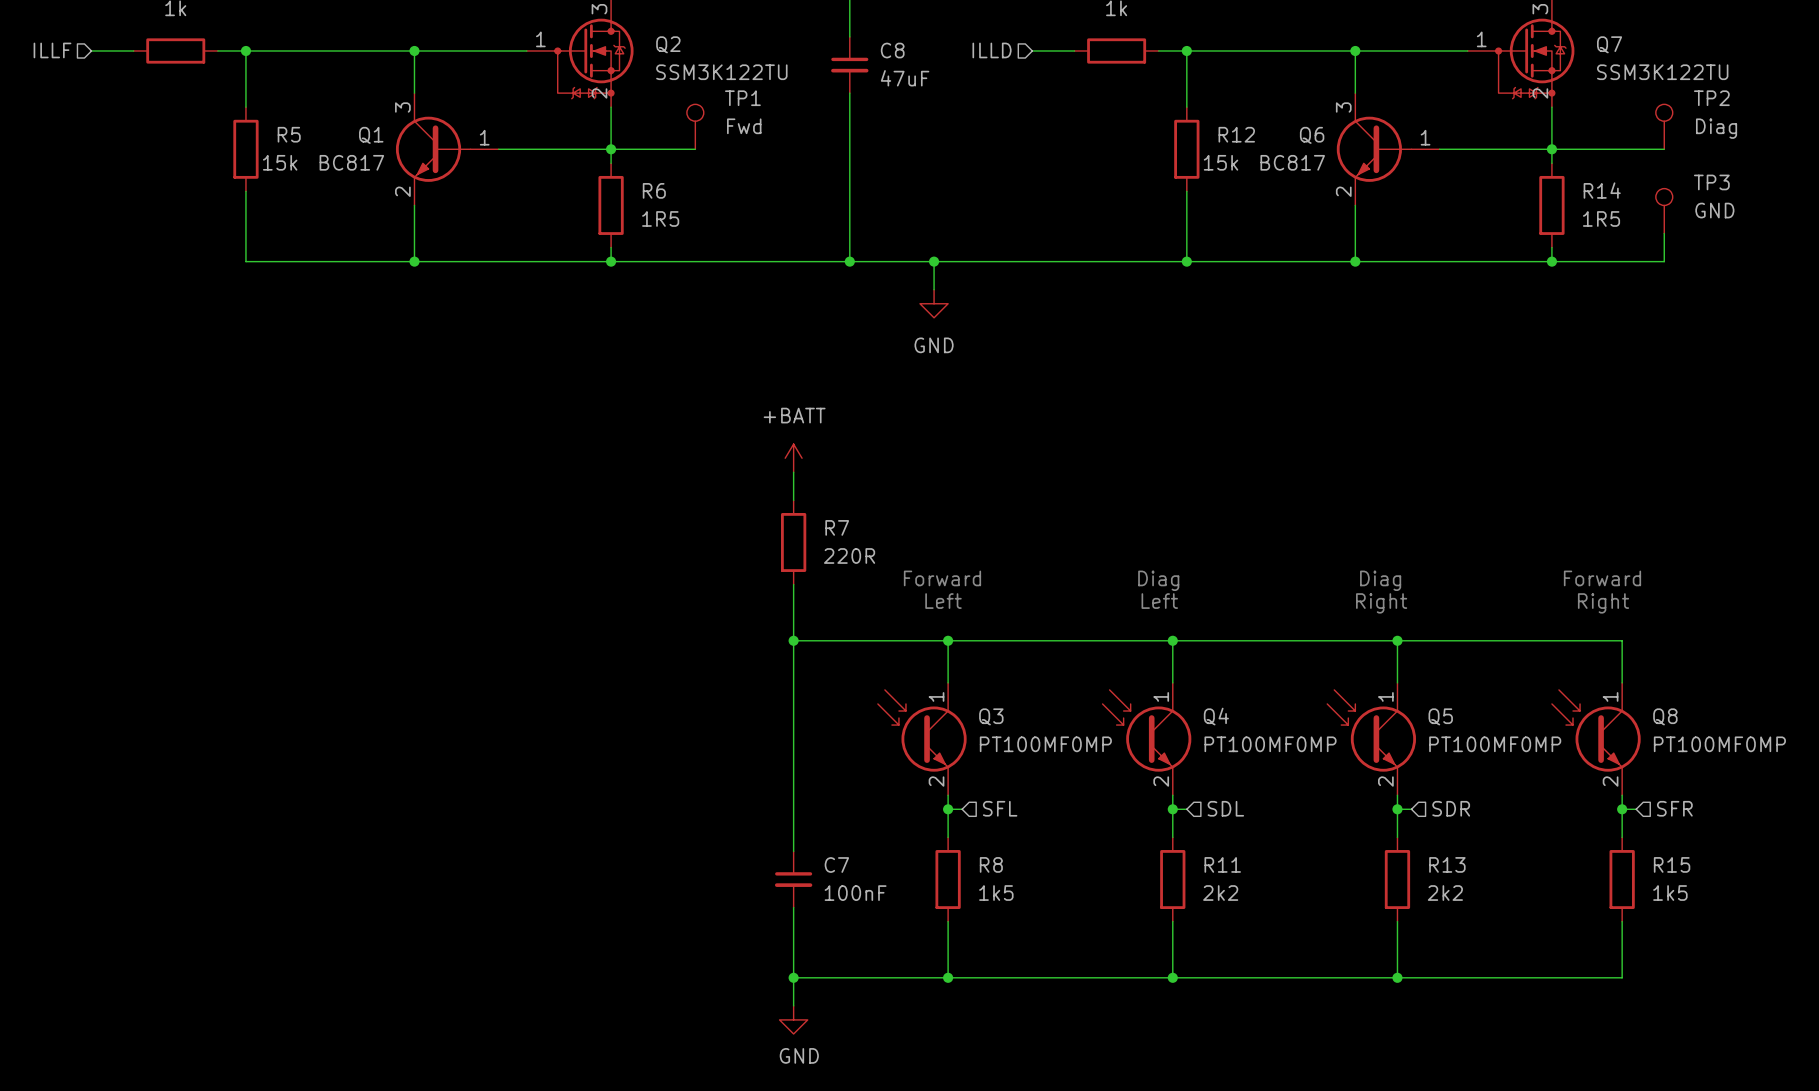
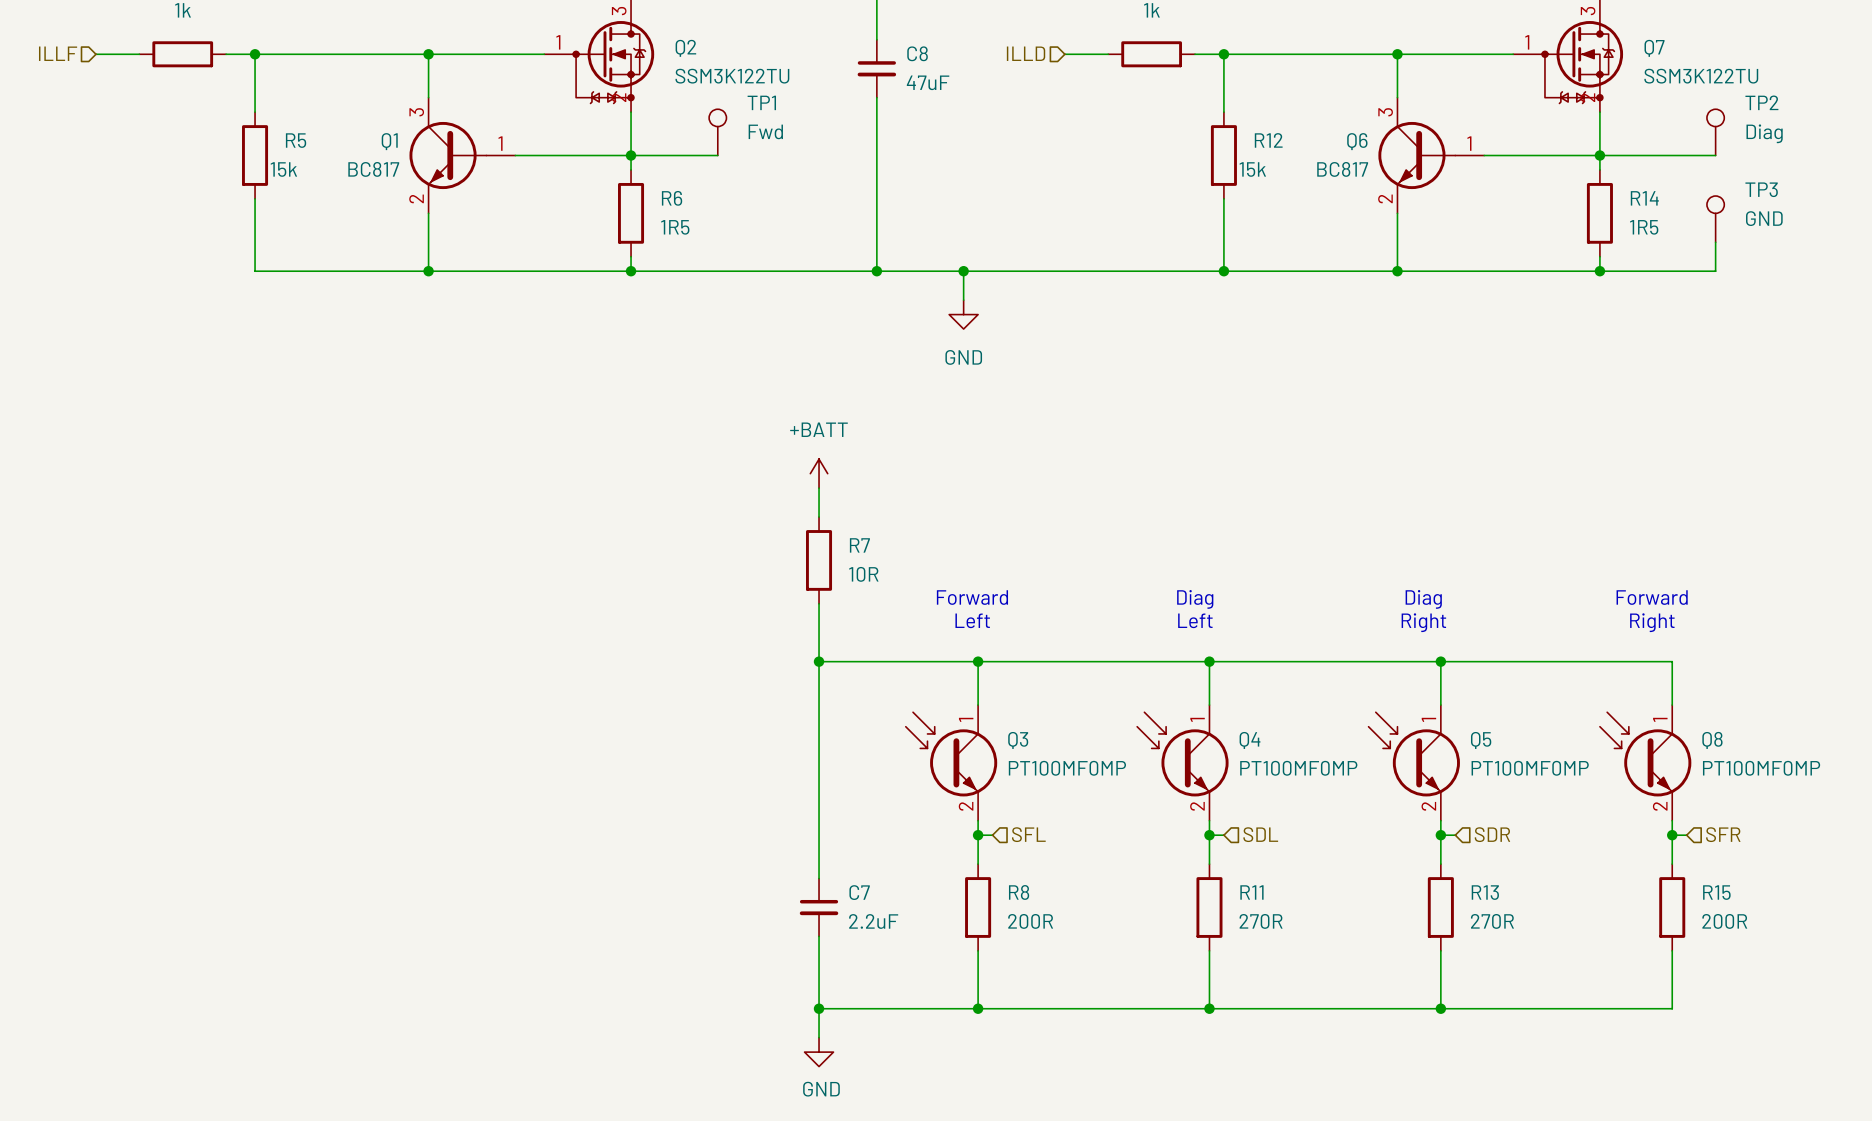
R7 value: 220R (849, 556) -> 10R (863, 574)
C7 value: 100nF (855, 893) -> 2.2uF (873, 921)
R8 value: 1k5 (996, 893) -> 200R (1030, 921)
R11 value: 2k2 (1220, 893) -> 270R (1261, 921)
R13 value: 2k2 (1445, 893) -> 270R (1492, 921)
R15 value: 1k5 (1670, 893) -> 200R (1724, 921)

